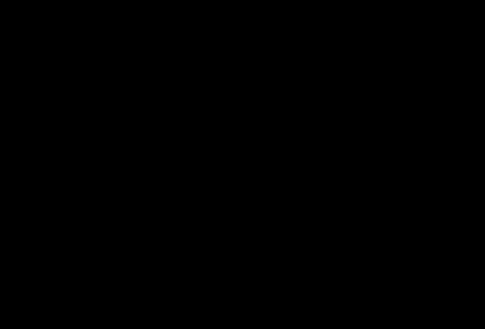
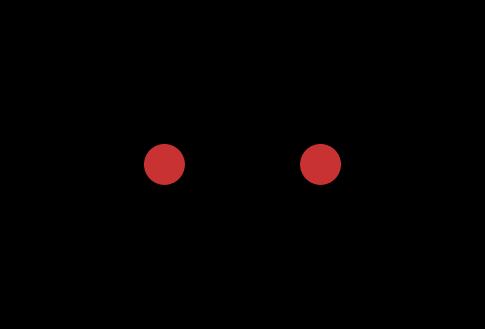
part: none -> (164, 164)
part: none -> (320, 164)

